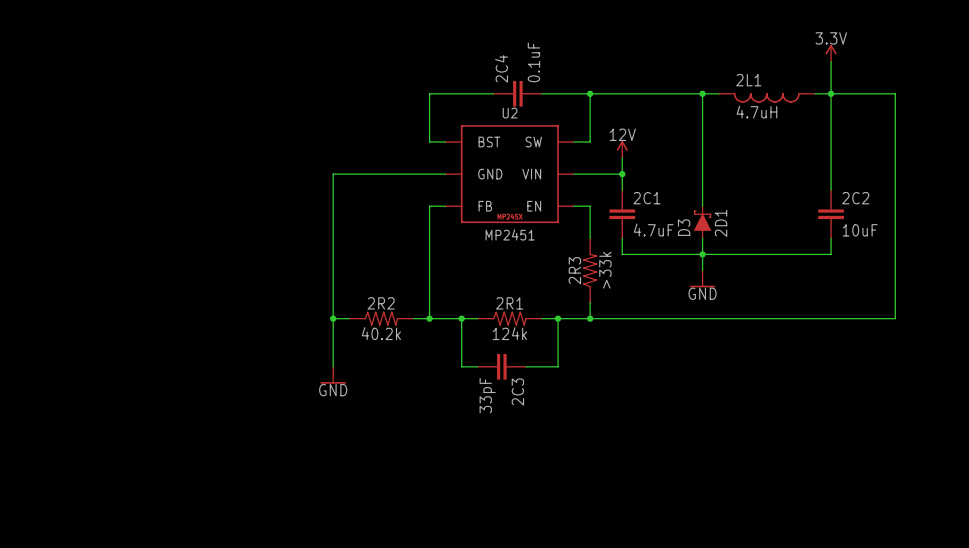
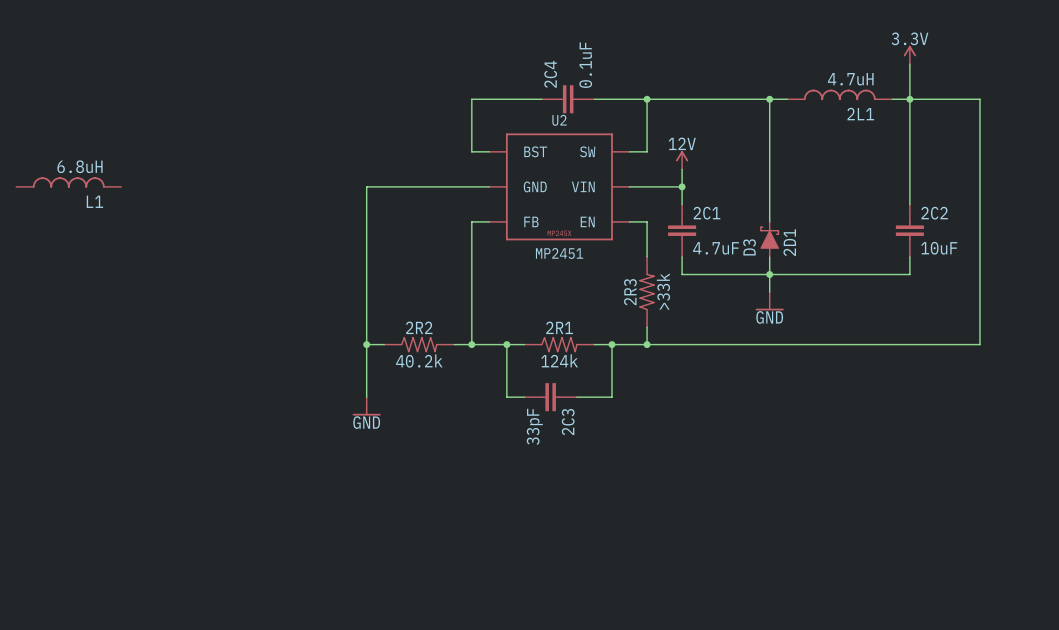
2L1 rotation: 0° (766, 97) -> 180° (839, 94)
L1: none -> 6.8uH (68, 182)

